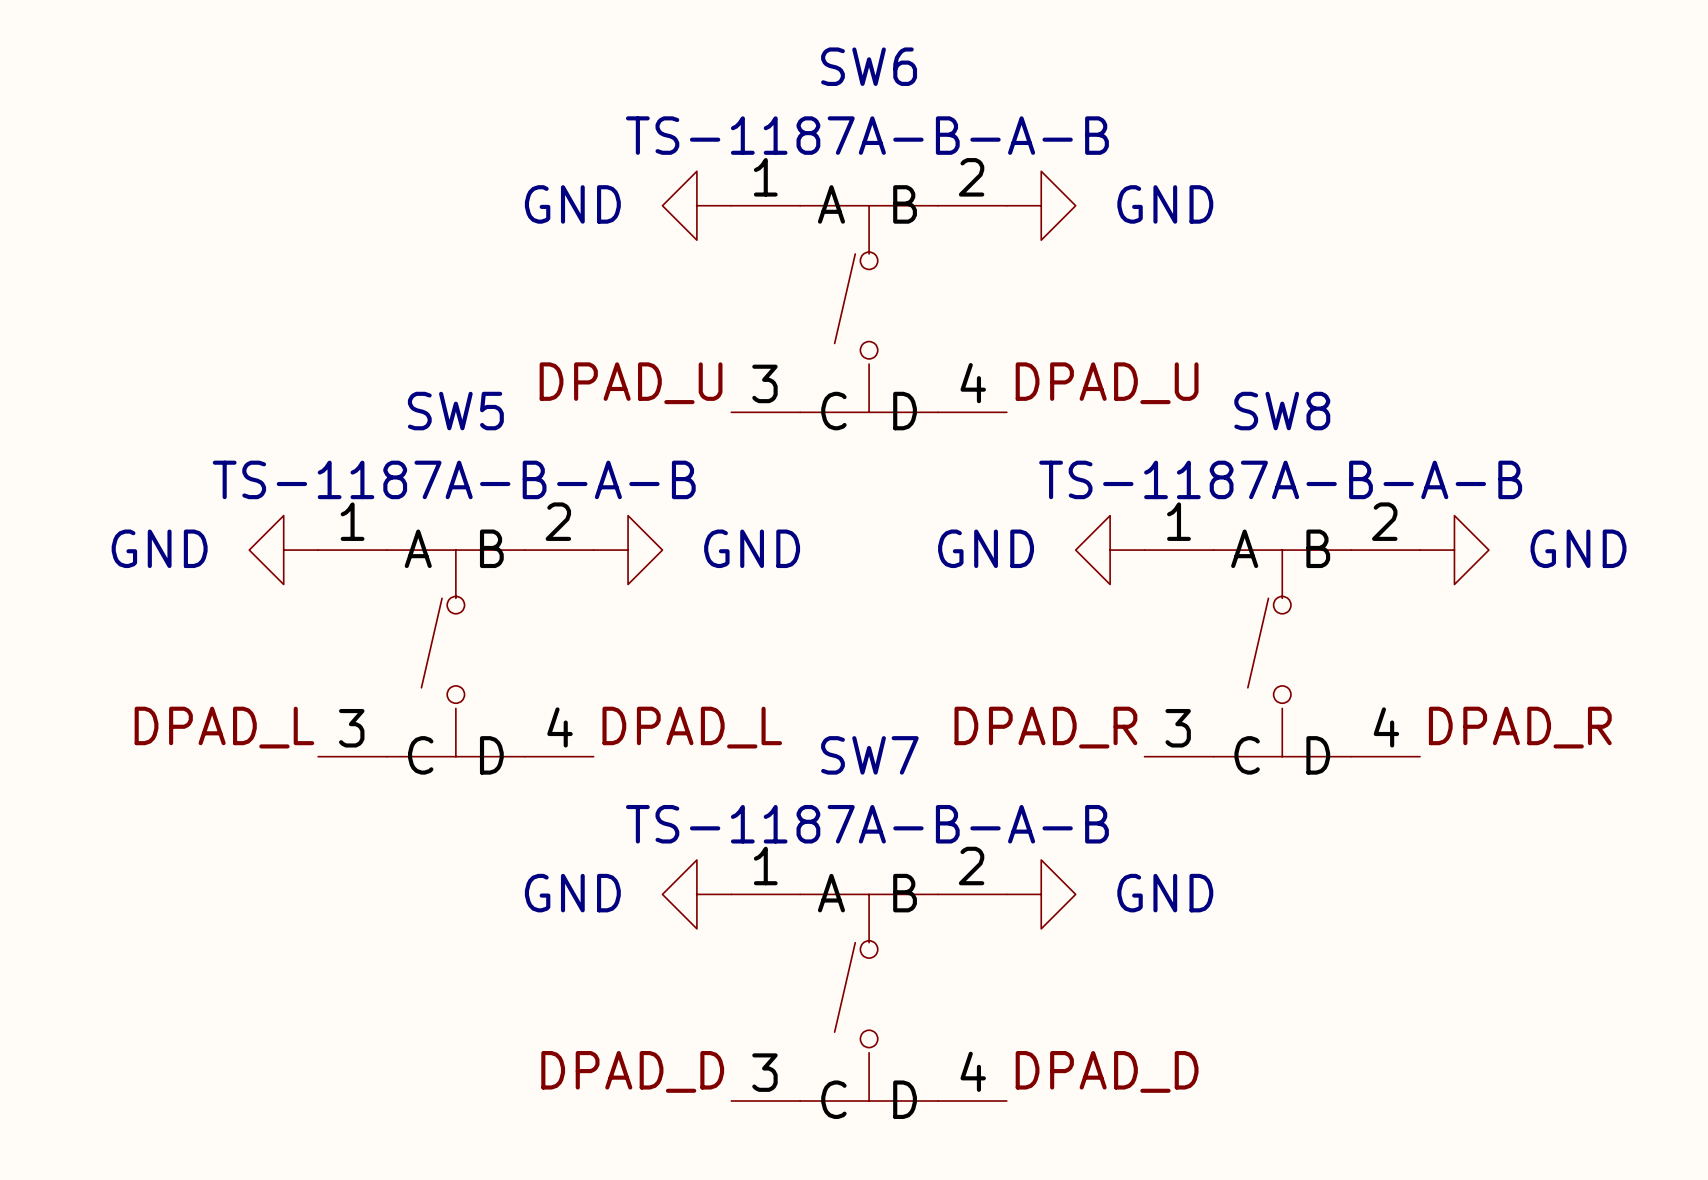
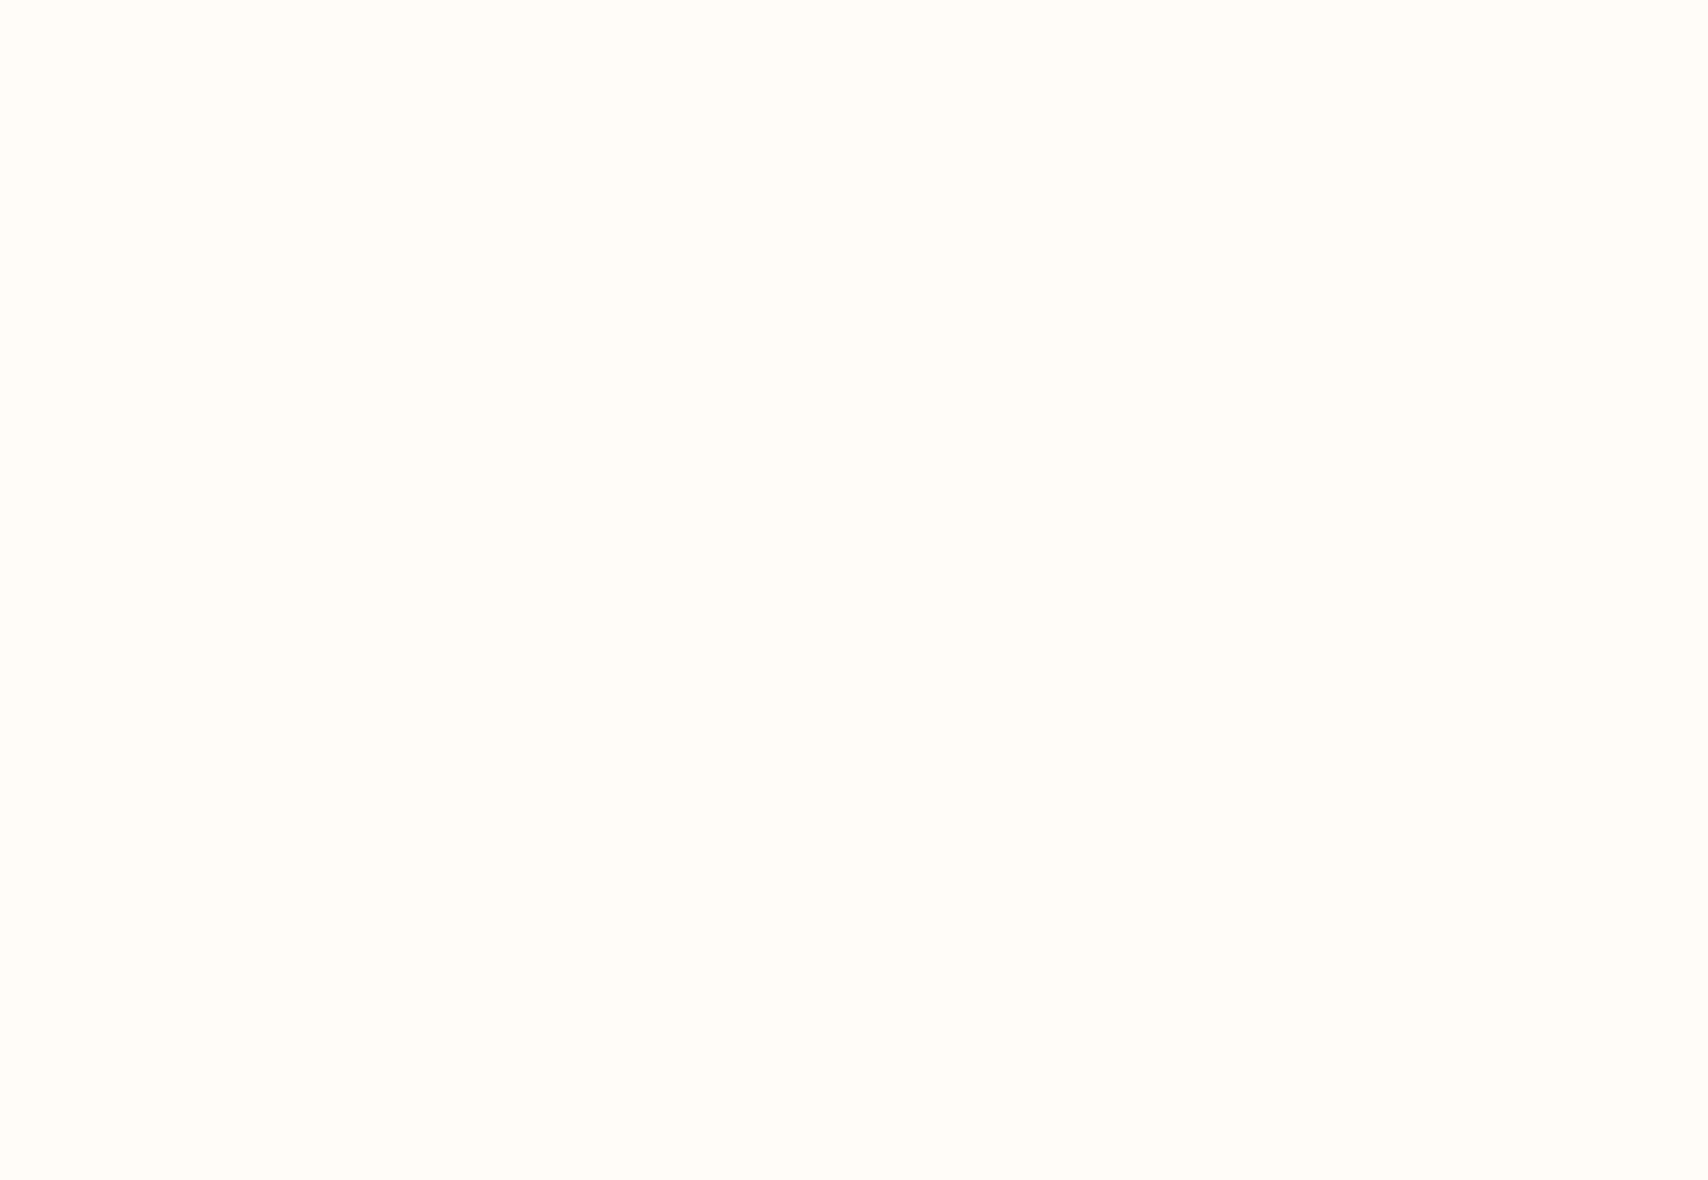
power symbol: GND (696, 205) -> none
power symbol: GND (1041, 205) -> none
SW6: TS-1187A-B-A-B (869, 309) -> none
label: DPAD_U (631, 383) -> none
label: DPAD_U (1107, 383) -> none
power symbol: GND (283, 550) -> none
power symbol: GND (628, 550) -> none
power symbol: GND (1110, 550) -> none
power symbol: GND (1454, 550) -> none
SW5: TS-1187A-B-A-B (455, 653) -> none
SW8: TS-1187A-B-A-B (1282, 653) -> none
label: DPAD_L (224, 727) -> none
label: DPAD_L (692, 727) -> none
label: DPAD_R (1045, 727) -> none
label: DPAD_R (1520, 727) -> none
power symbol: GND (696, 894) -> none
power symbol: GND (1041, 894) -> none
SW7: TS-1187A-B-A-B (869, 997) -> none
label: DPAD_D (632, 1071) -> none
label: DPAD_D (1107, 1071) -> none

